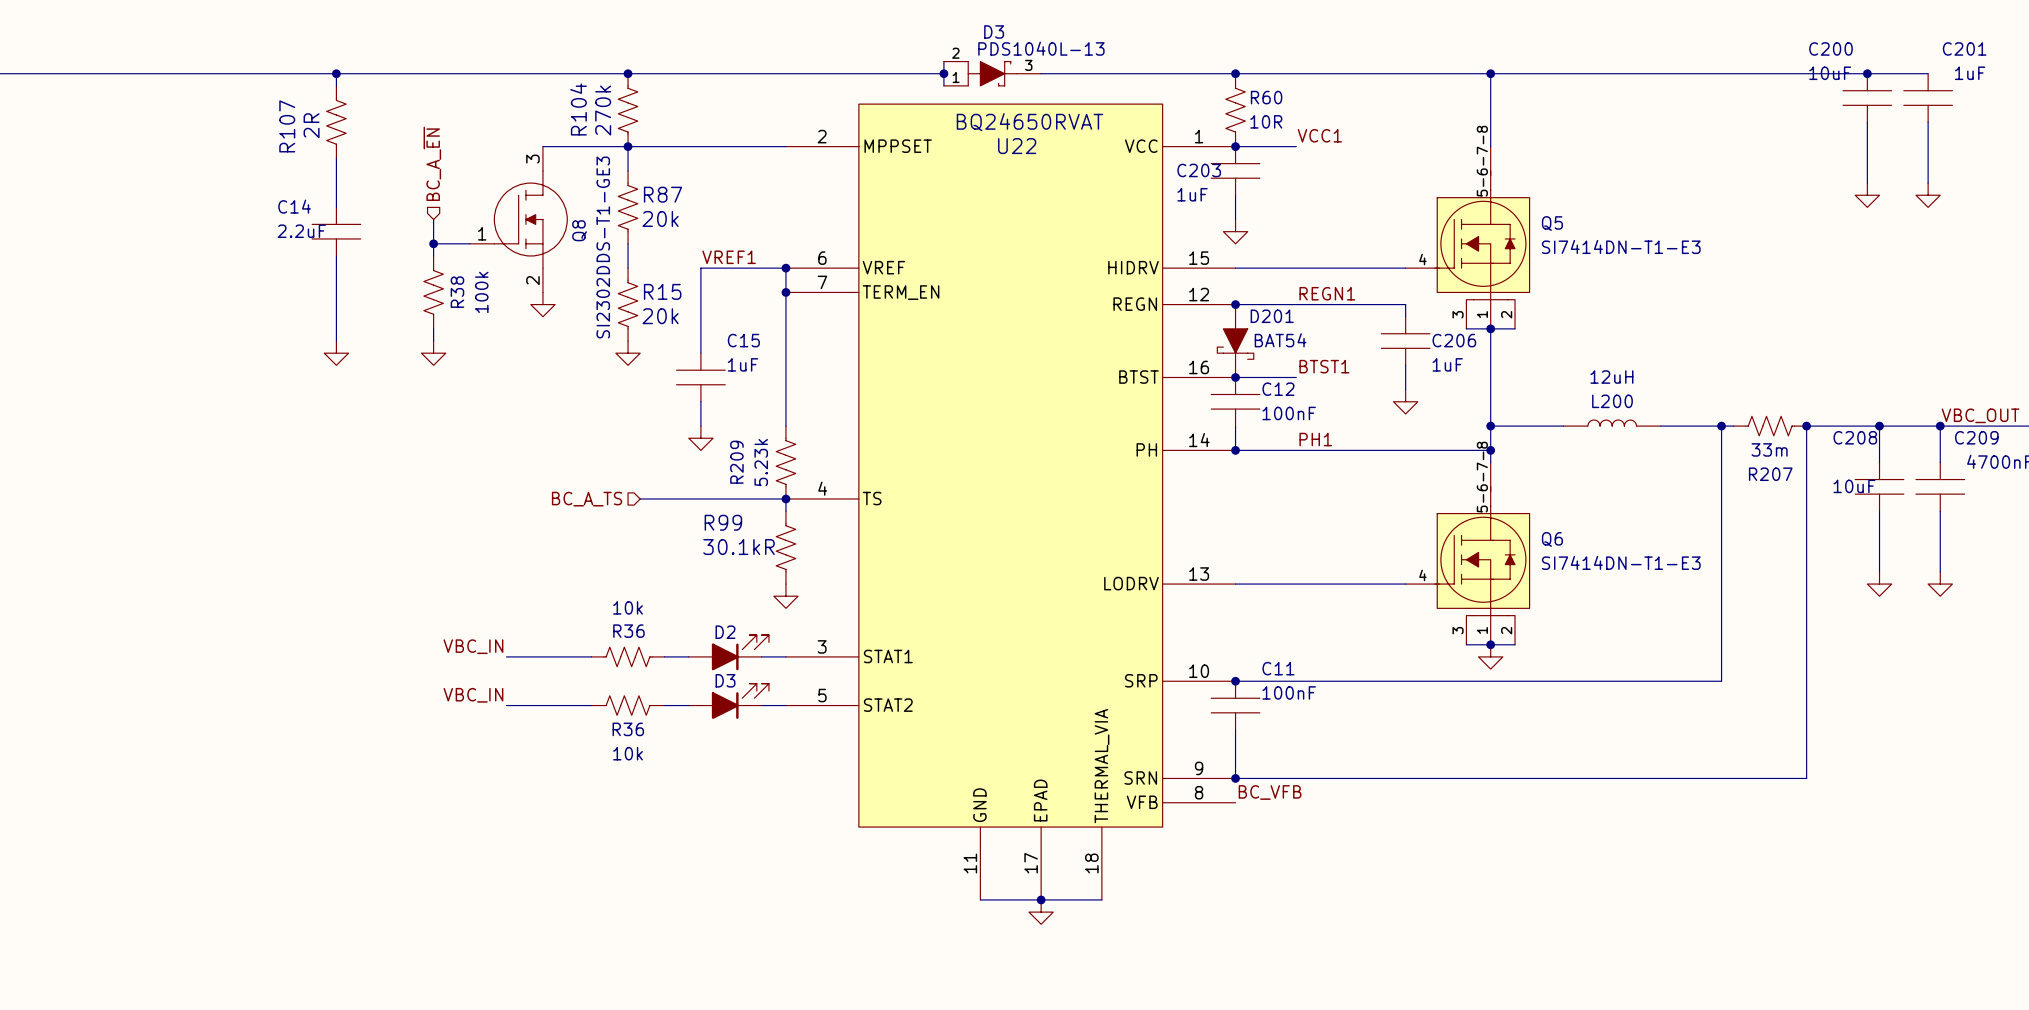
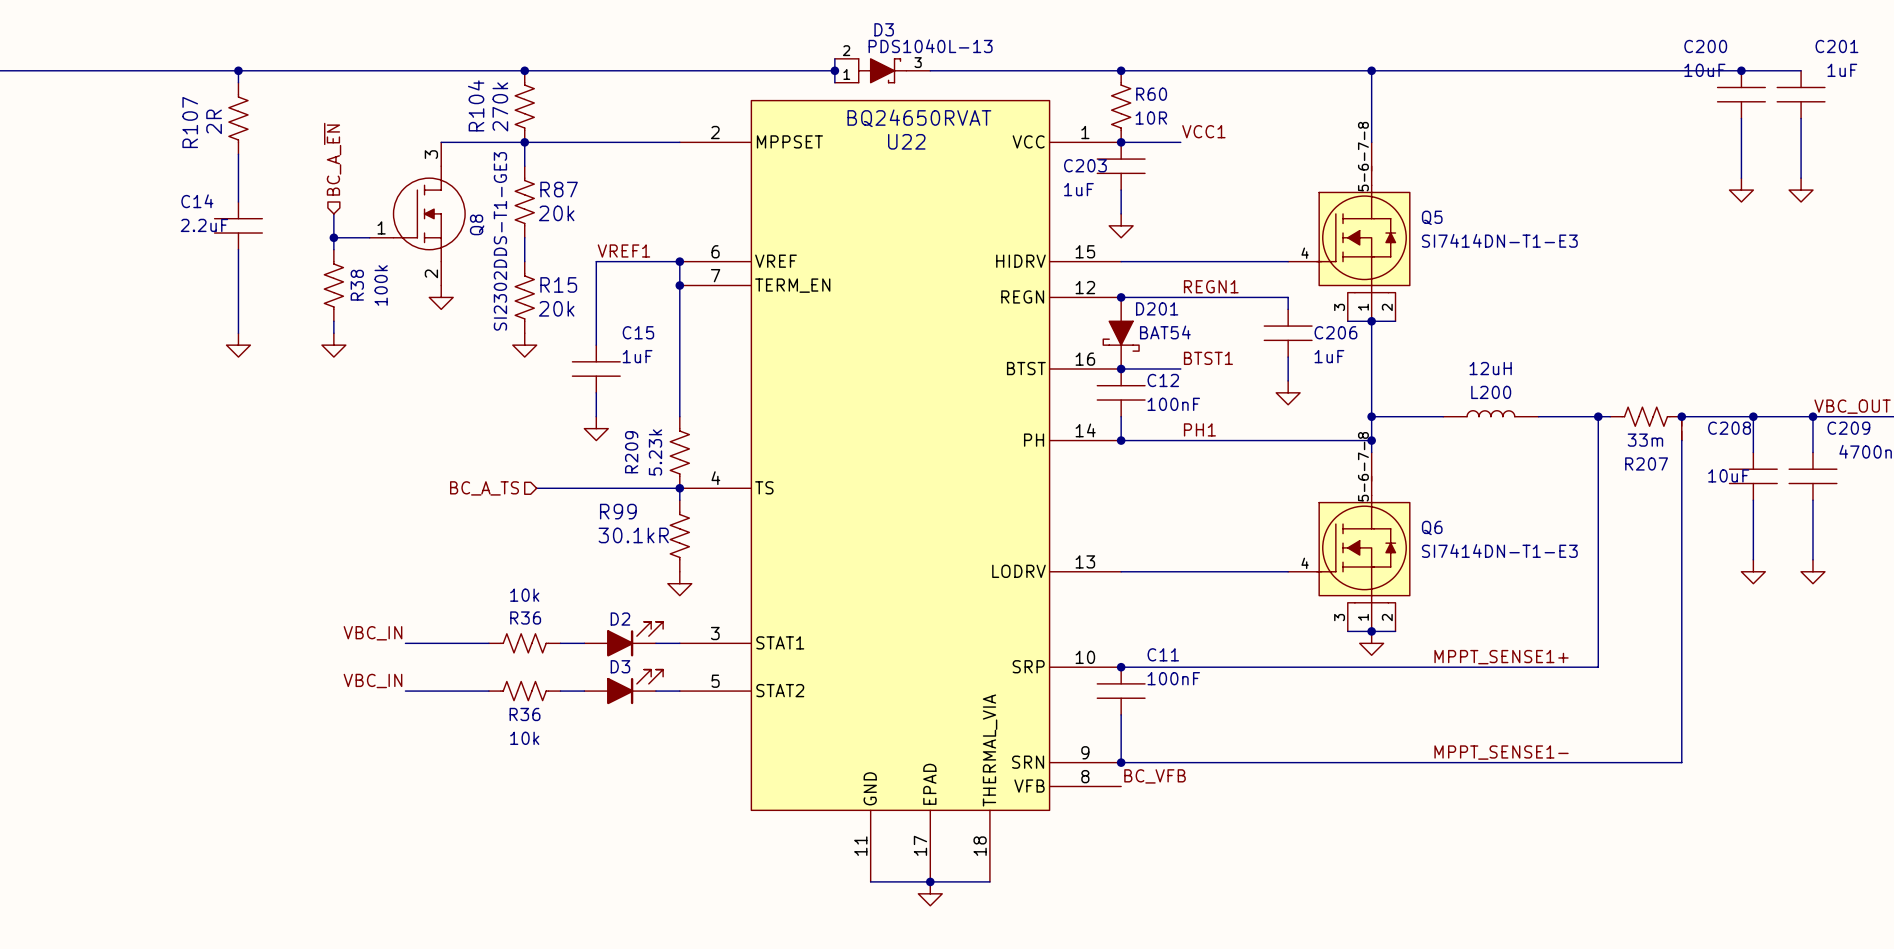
part: none -> (1681, 428)
label: none -> MPPT_SENSE1+ (1501, 657)
label: none -> MPPT_SENSE1- (1501, 752)

